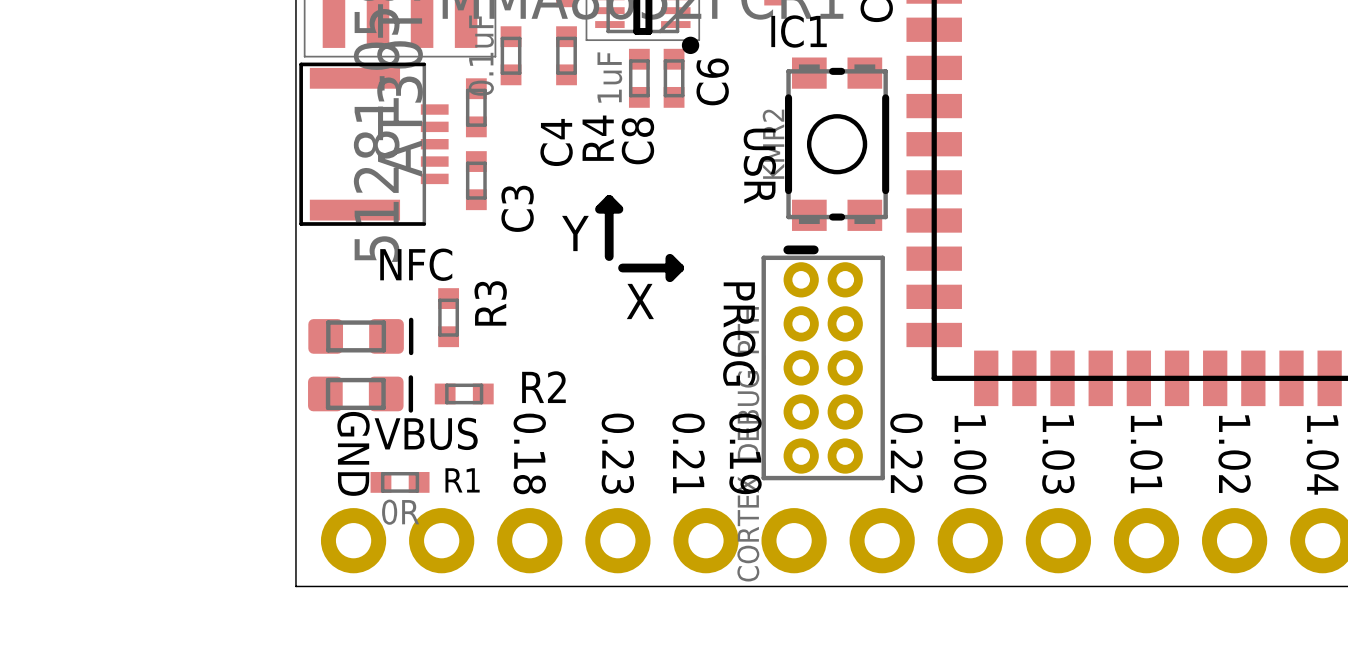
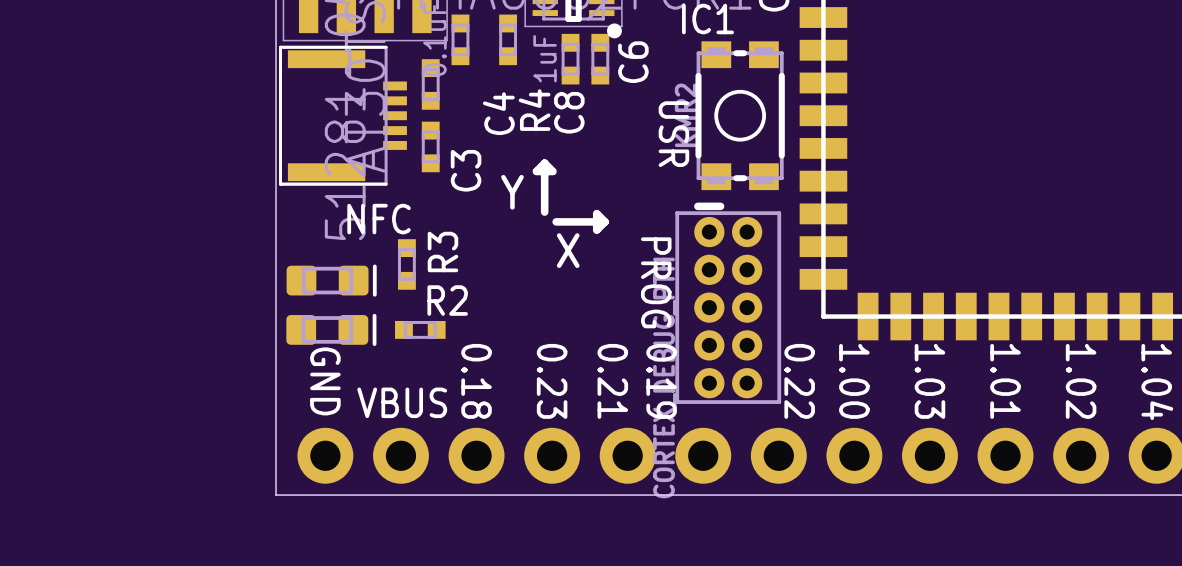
R2 name position: R2 (543, 387) -> R2 (447, 300)
text position: VBUS (426, 433) -> VBUS (402, 402)
R1: 0R (400, 482) -> none

